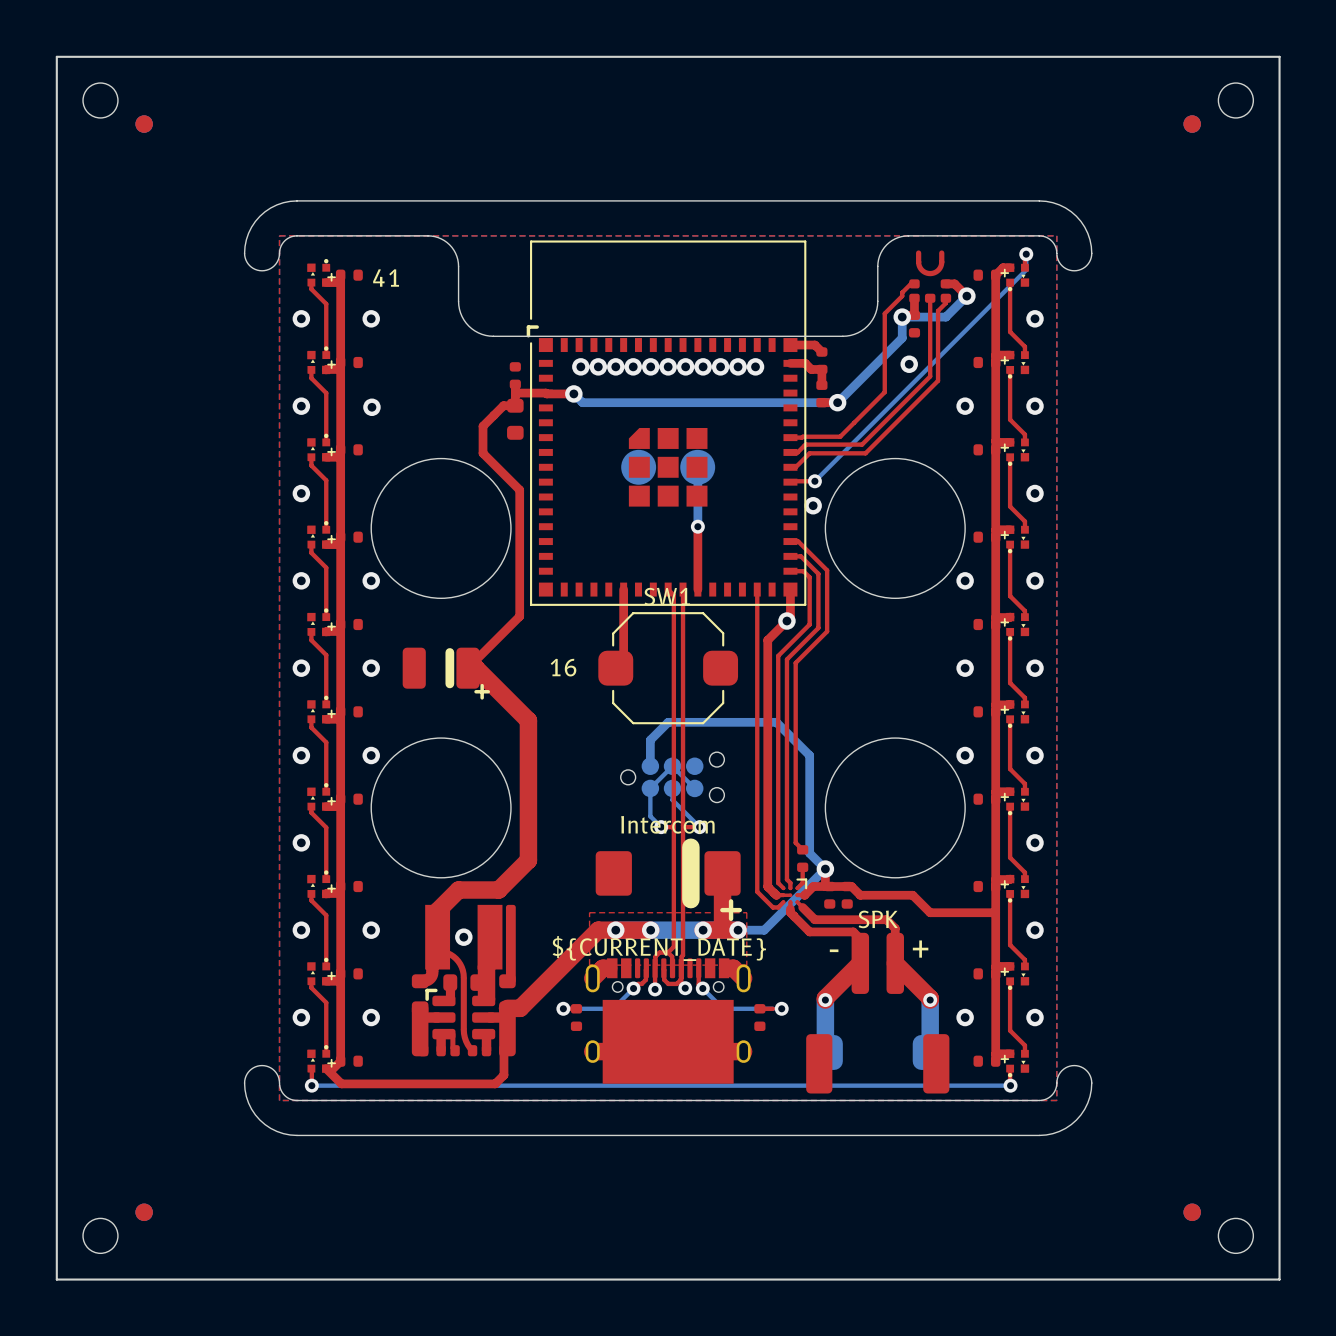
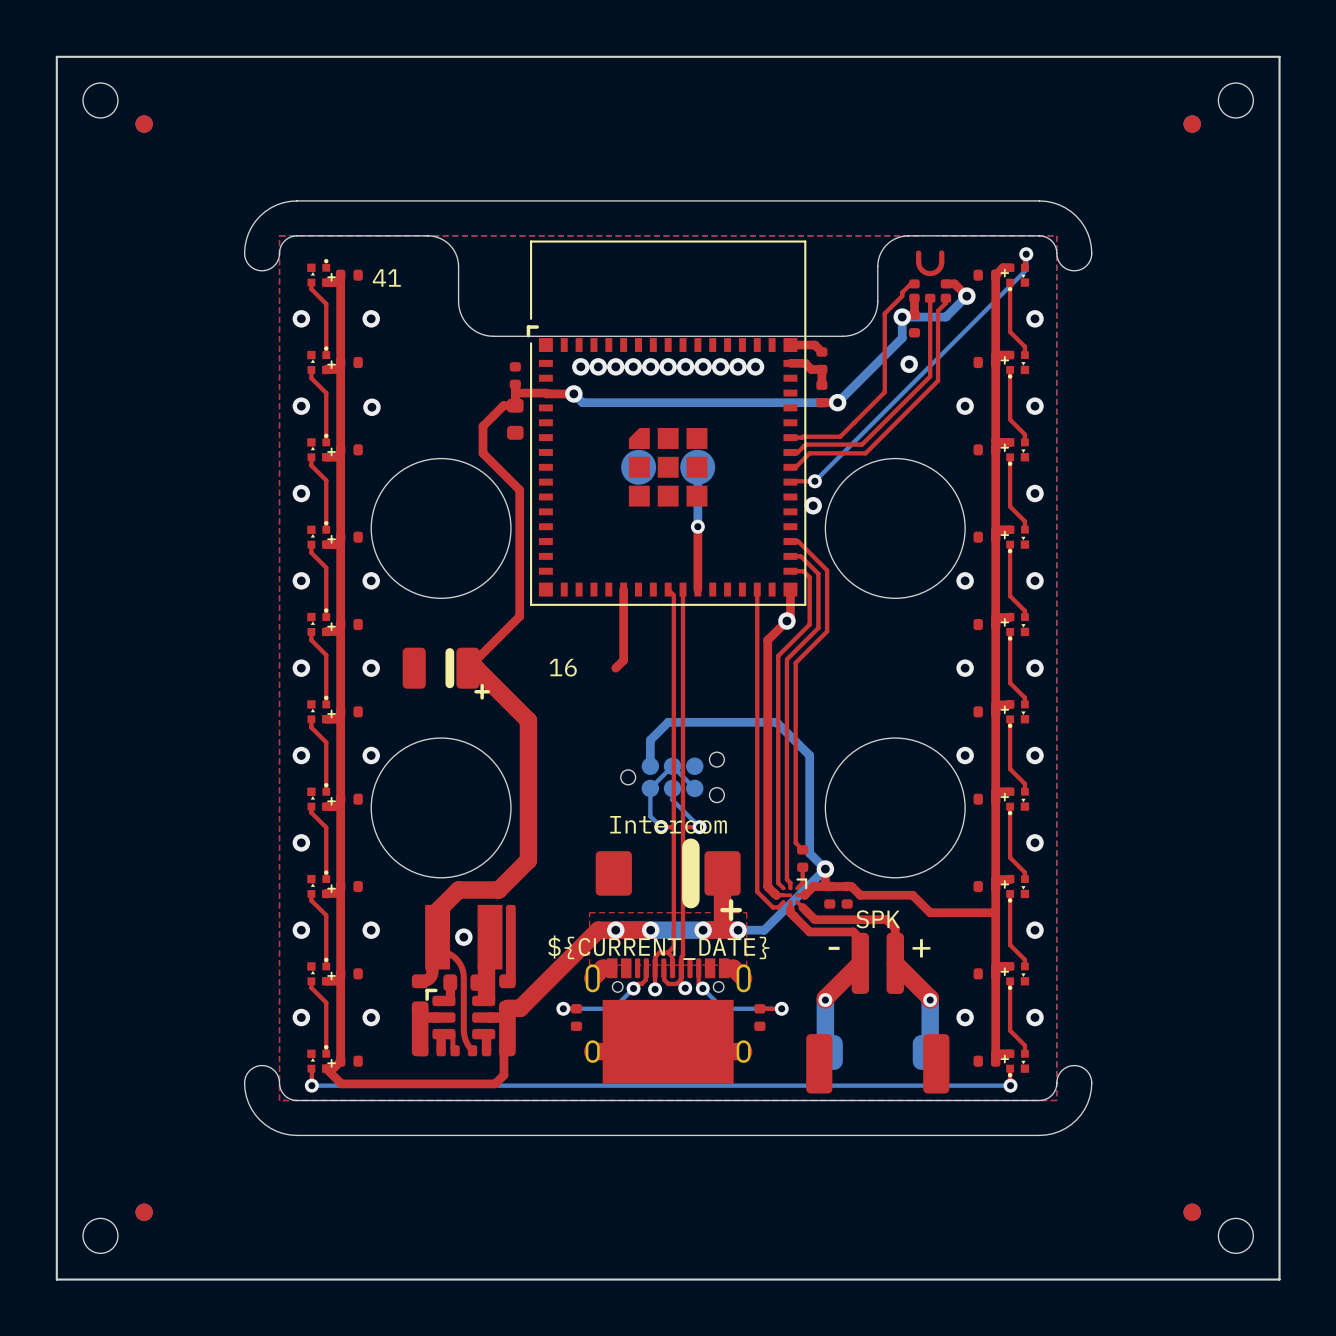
SW1: (668, 668) -> none

